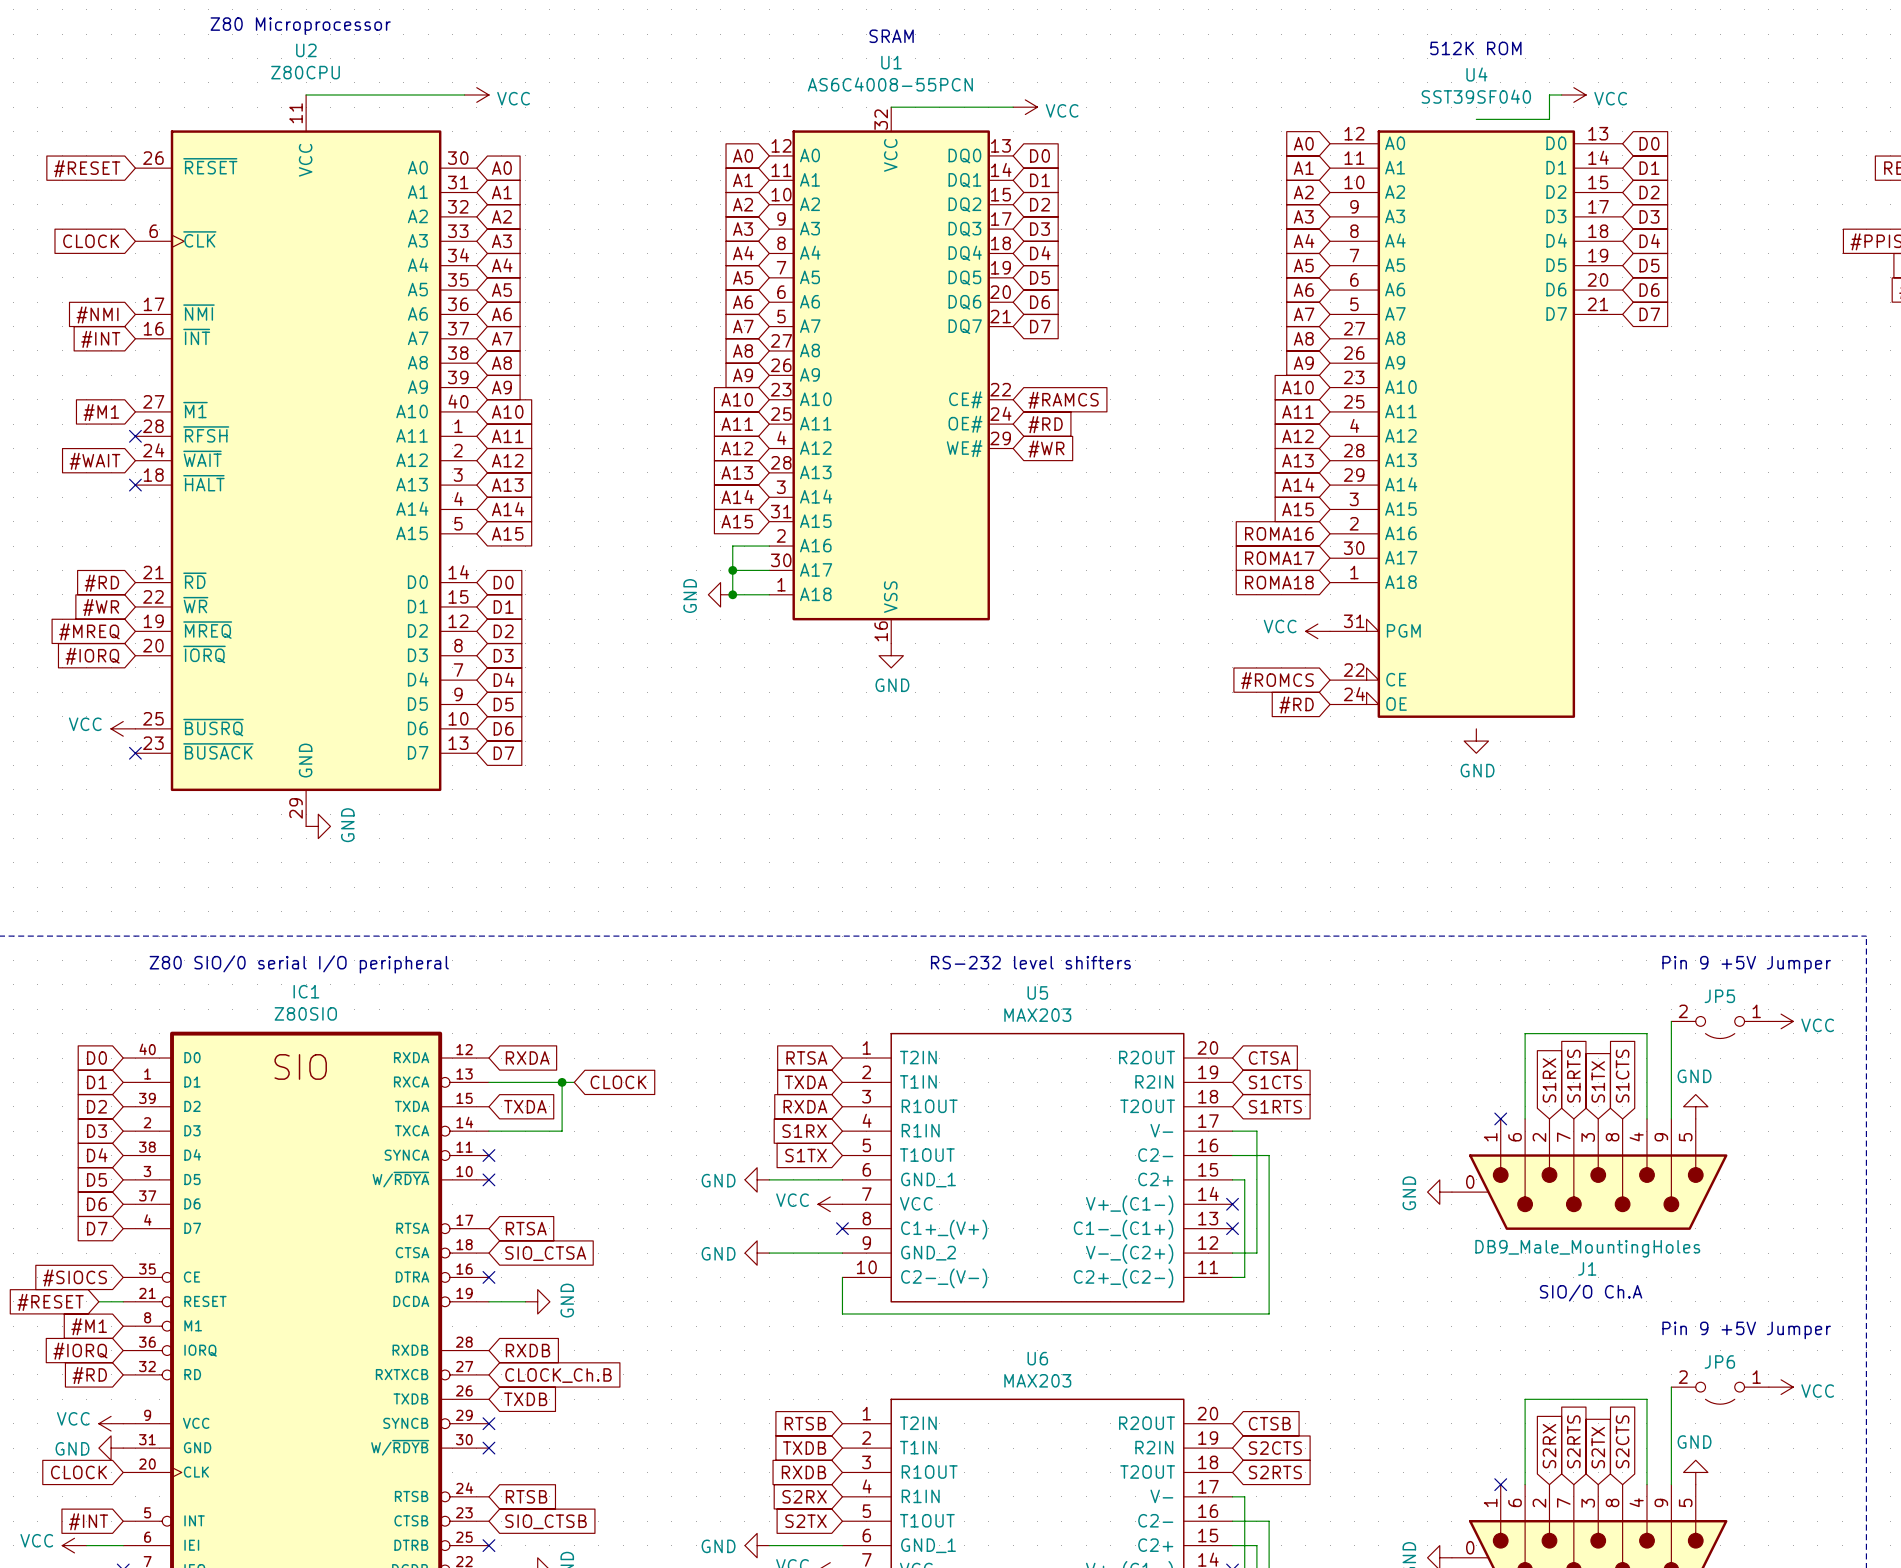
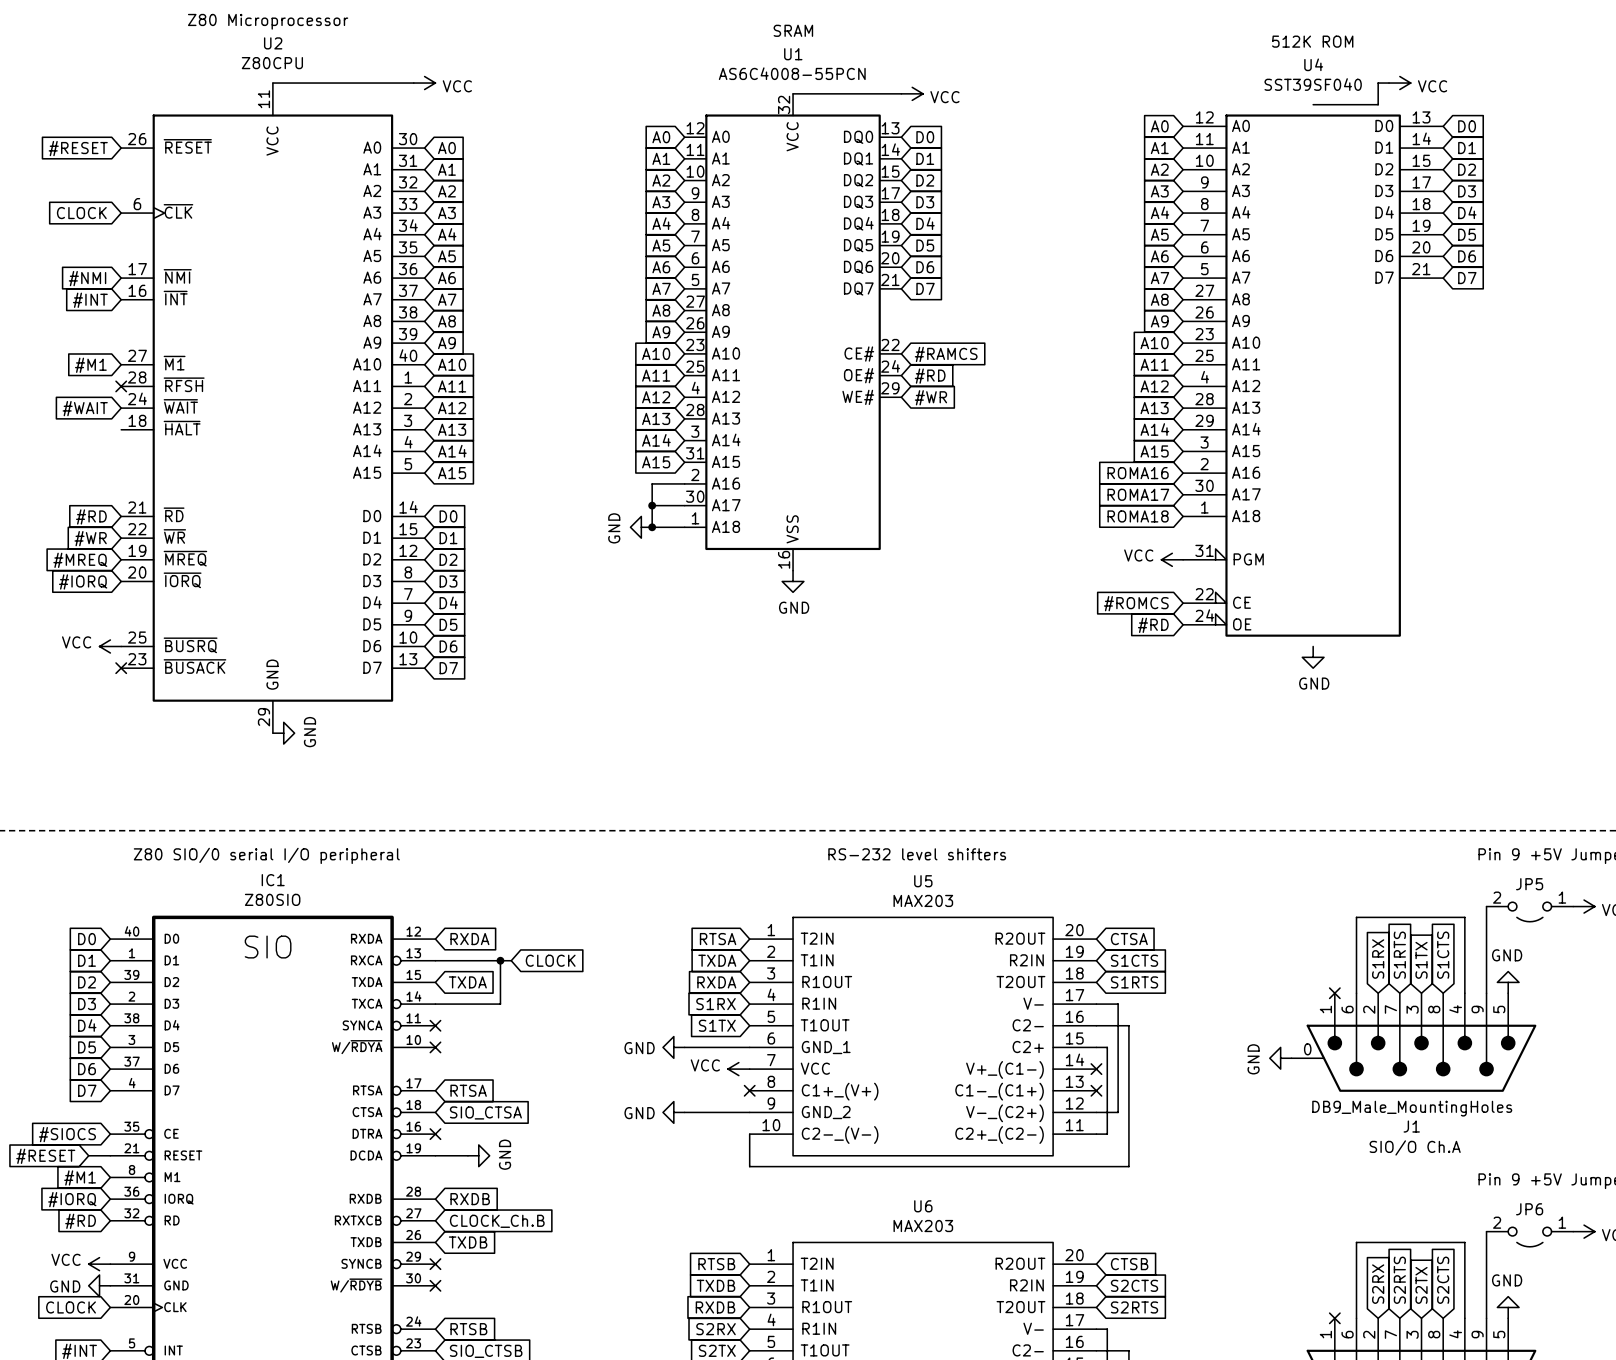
no-connect mark: (135, 485) -> none

